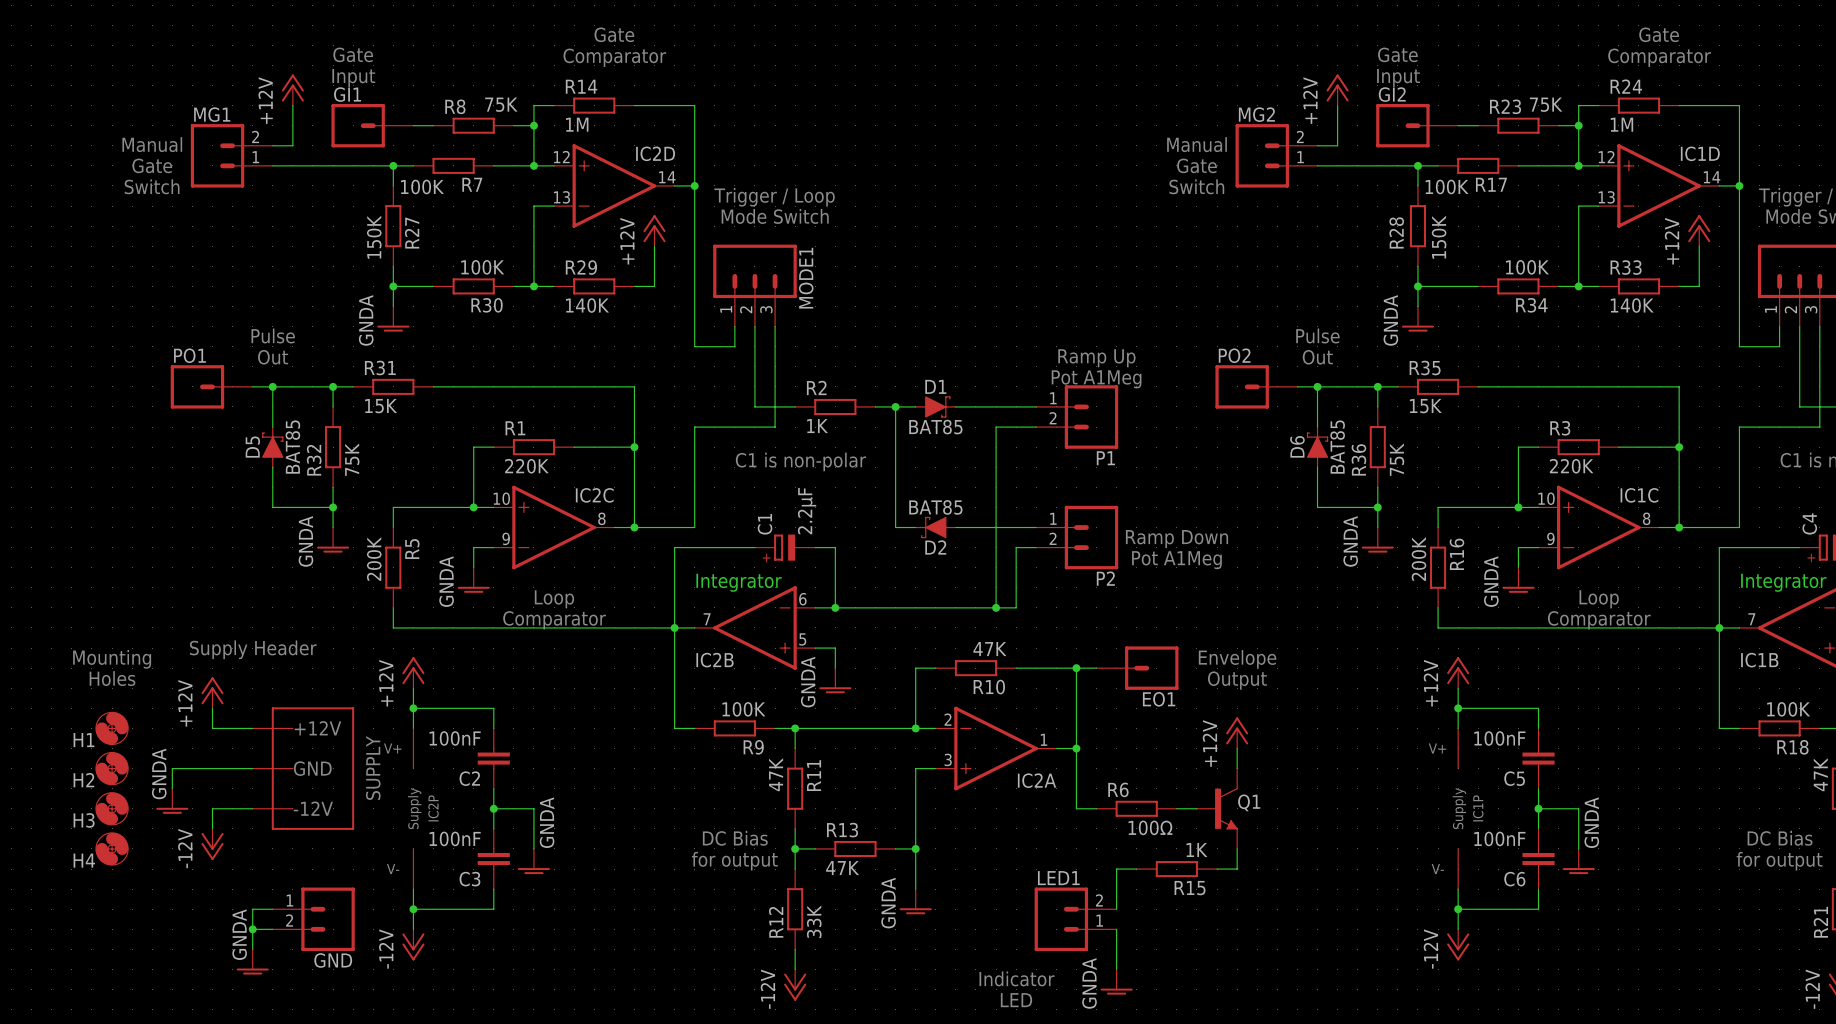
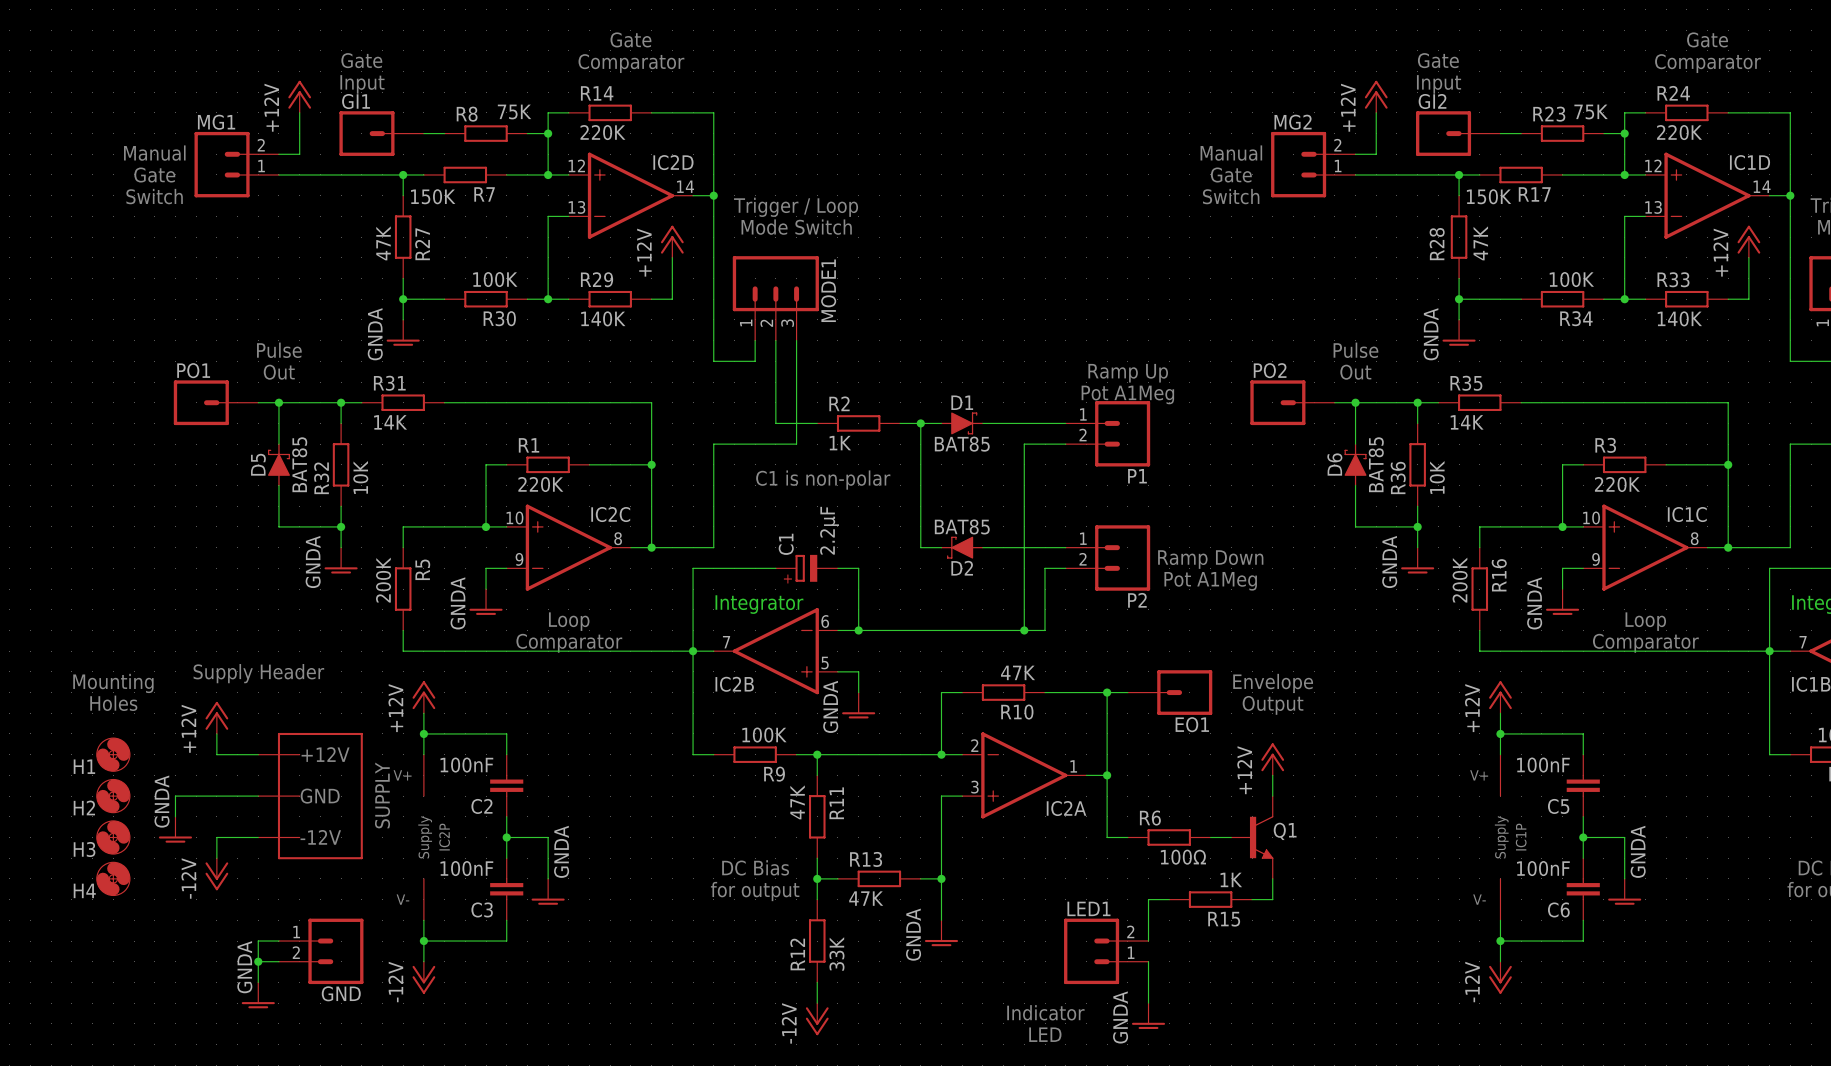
R14 value: 1M (577, 124) -> 220K (602, 132)
R24 value: 1M (1621, 124) -> 220K (1679, 132)
R7 value: 100K (422, 186) -> 150K (433, 196)
R17 value: 100K (1447, 186) -> 150K (1489, 196)
R27 value: 150K (374, 237) -> 47K (383, 243)
R28 value: 150K (1439, 237) -> 47K (1480, 243)
R31 value: 15K (381, 406) -> 14K (390, 422)
R35 value: 15K (1425, 406) -> 14K (1467, 422)
R32 value: 75K (352, 459) -> 10K (360, 477)
R36 value: 75K (1397, 459) -> 10K (1437, 477)

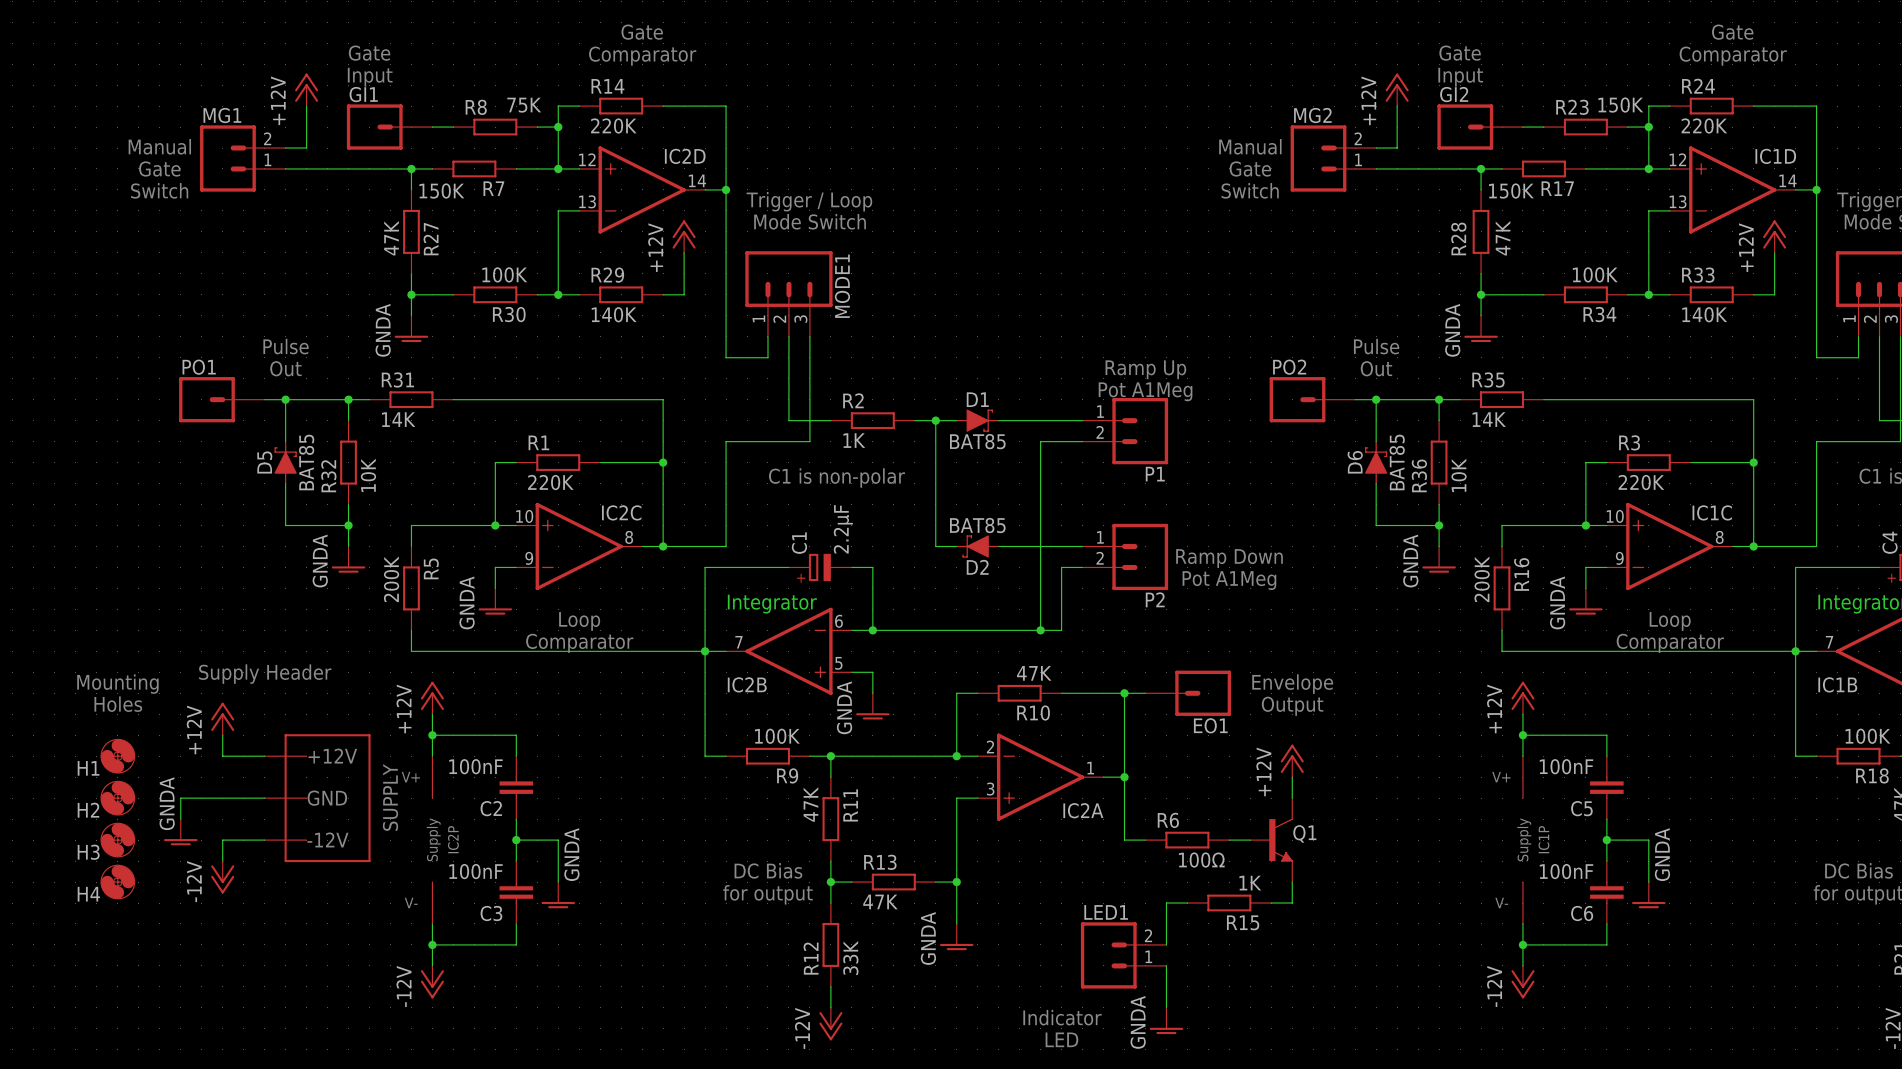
R23 value: 75K (1591, 111) -> 150K (1620, 105)
wire: (278, 941) (258, 941) (258, 982) -> none
GND: (321, 951) -> none
wire: (258, 961) (278, 961) -> none
junction: (258, 961) -> none
power symbol: GNDA (258, 995) -> none

